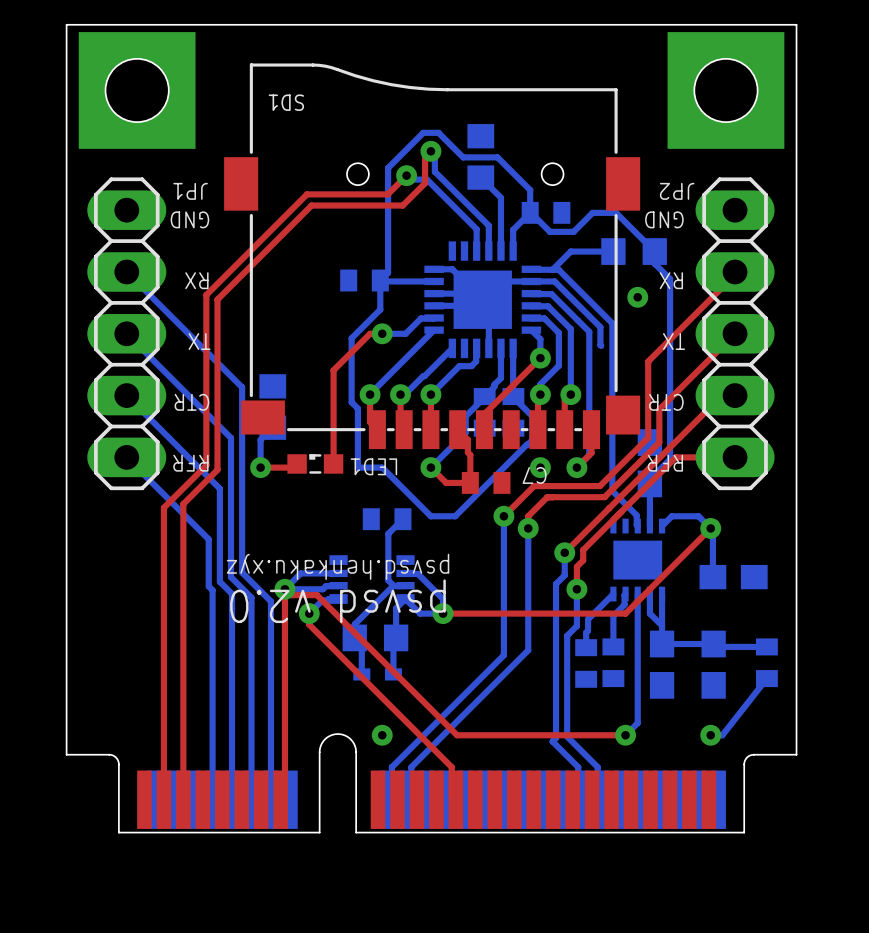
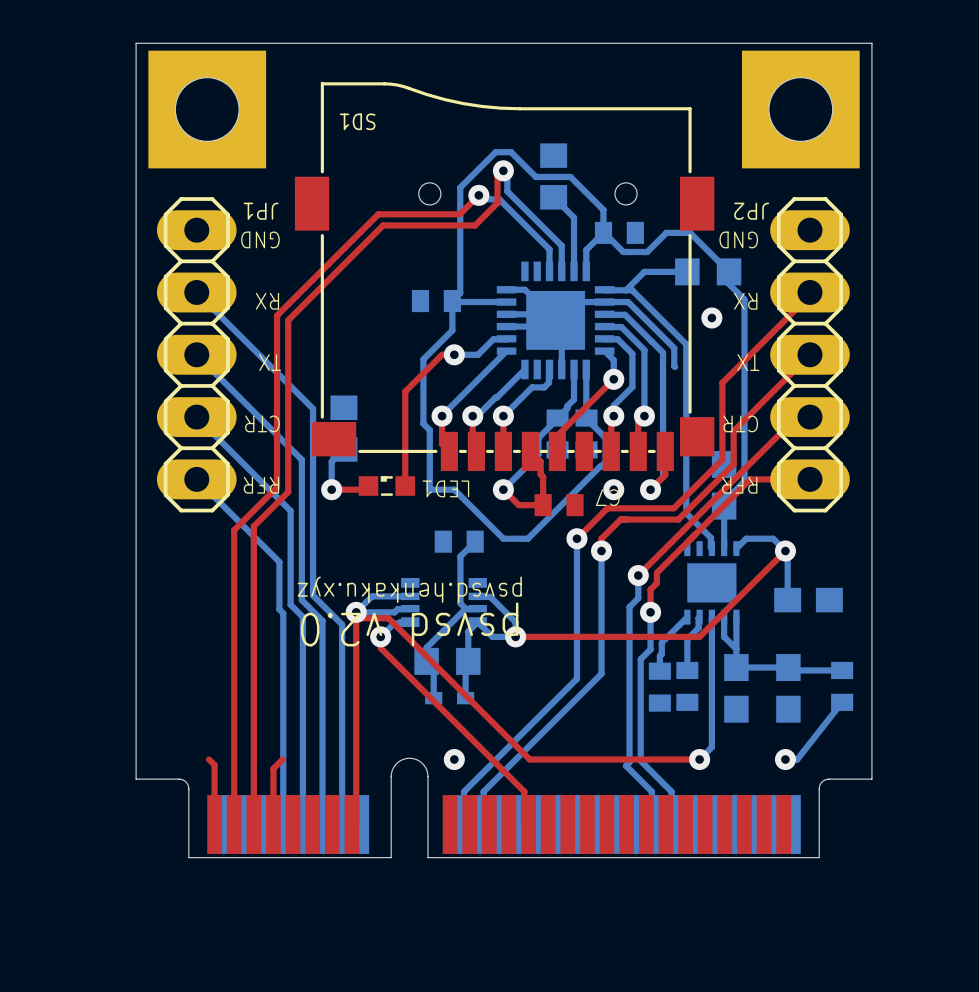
top track: none -> (209, 759) (214, 765) (214, 824)
top track: none -> (282, 759) (273, 768) (273, 824)

